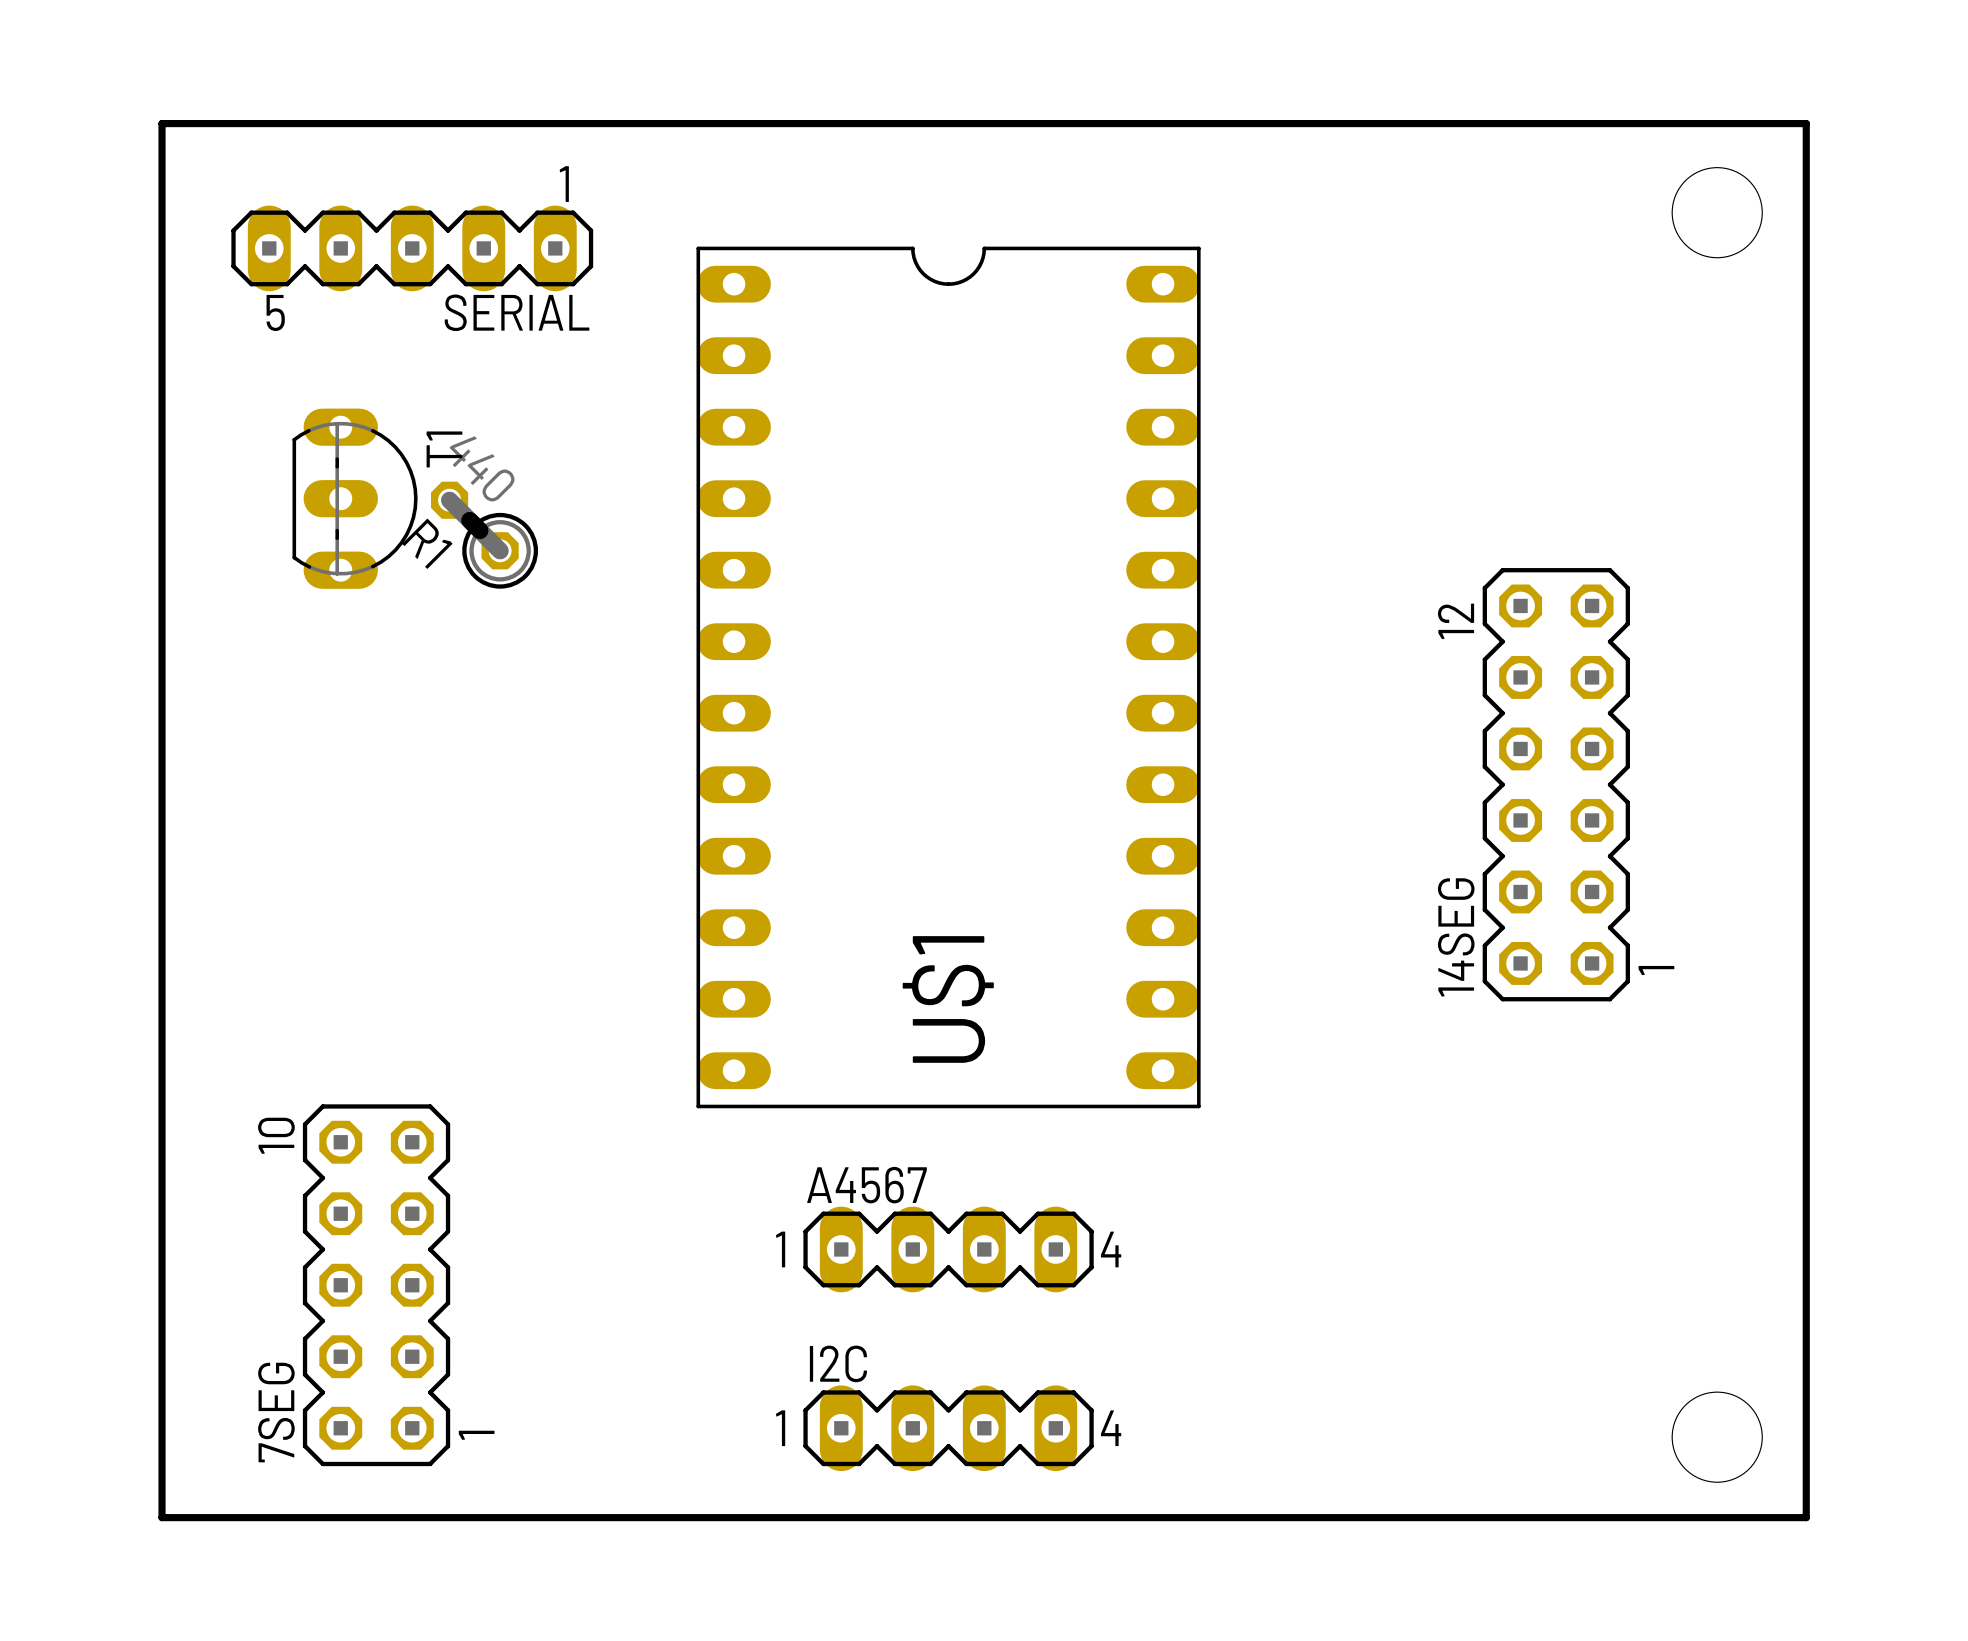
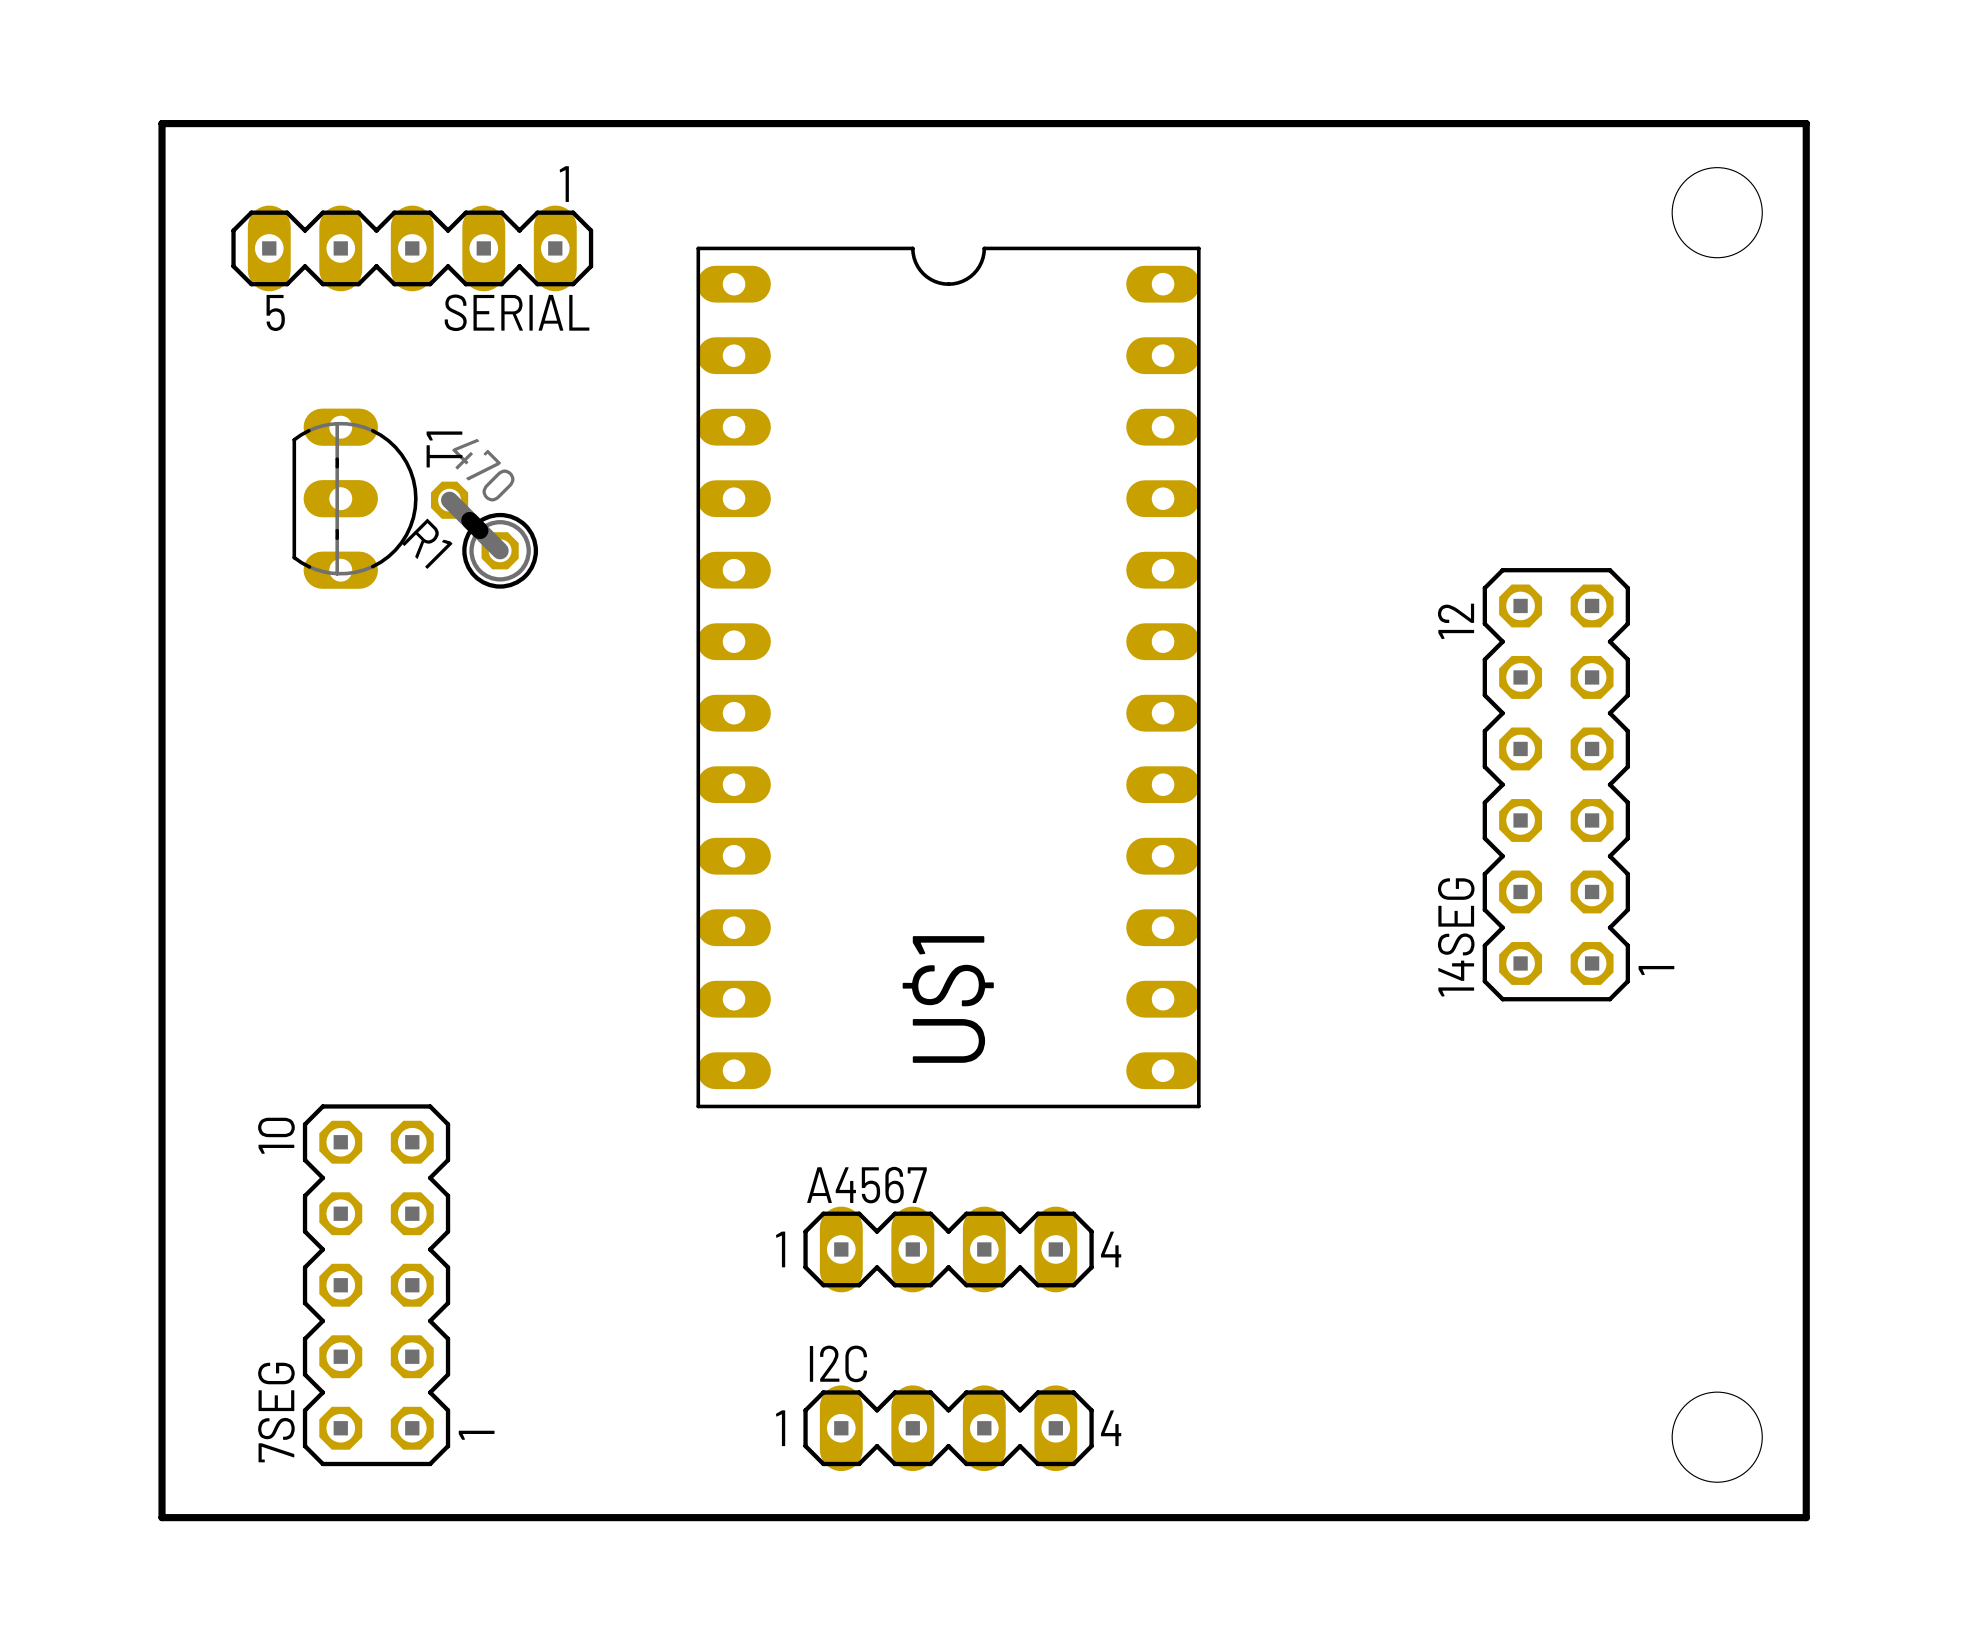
R1 value: 440 (482, 468) -> 470 (483, 470)

